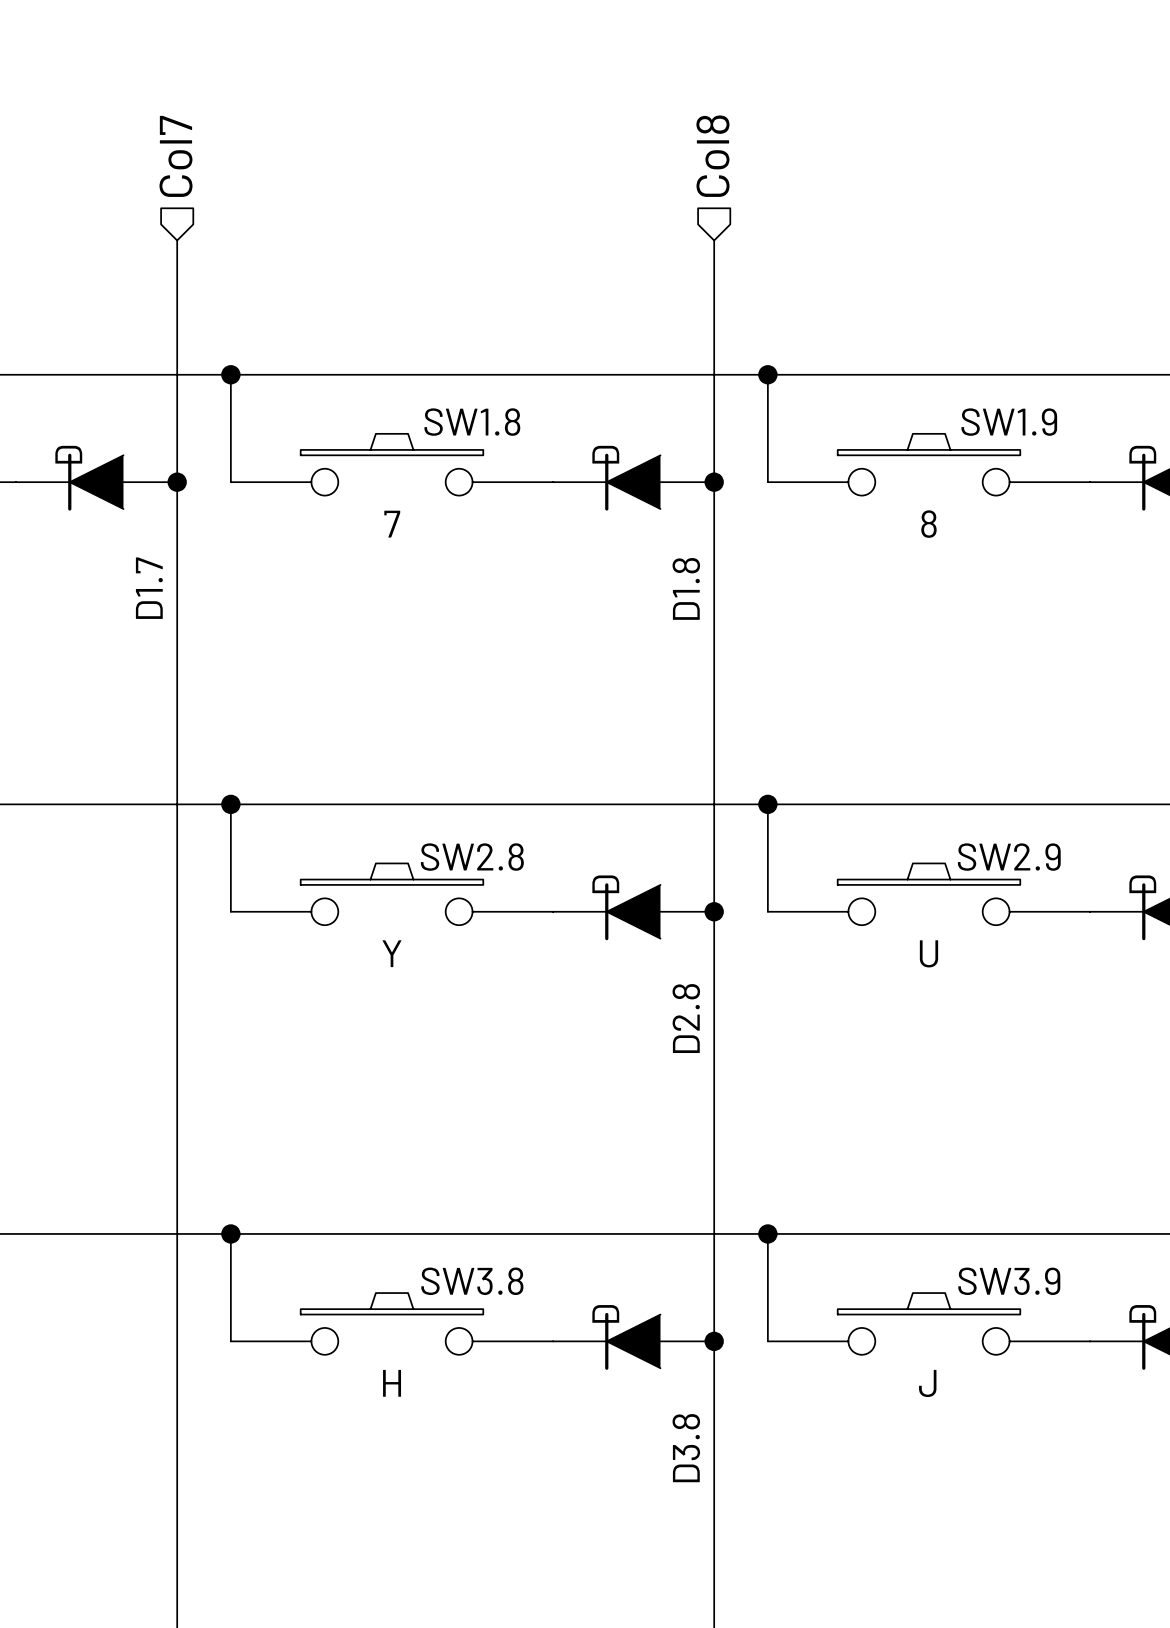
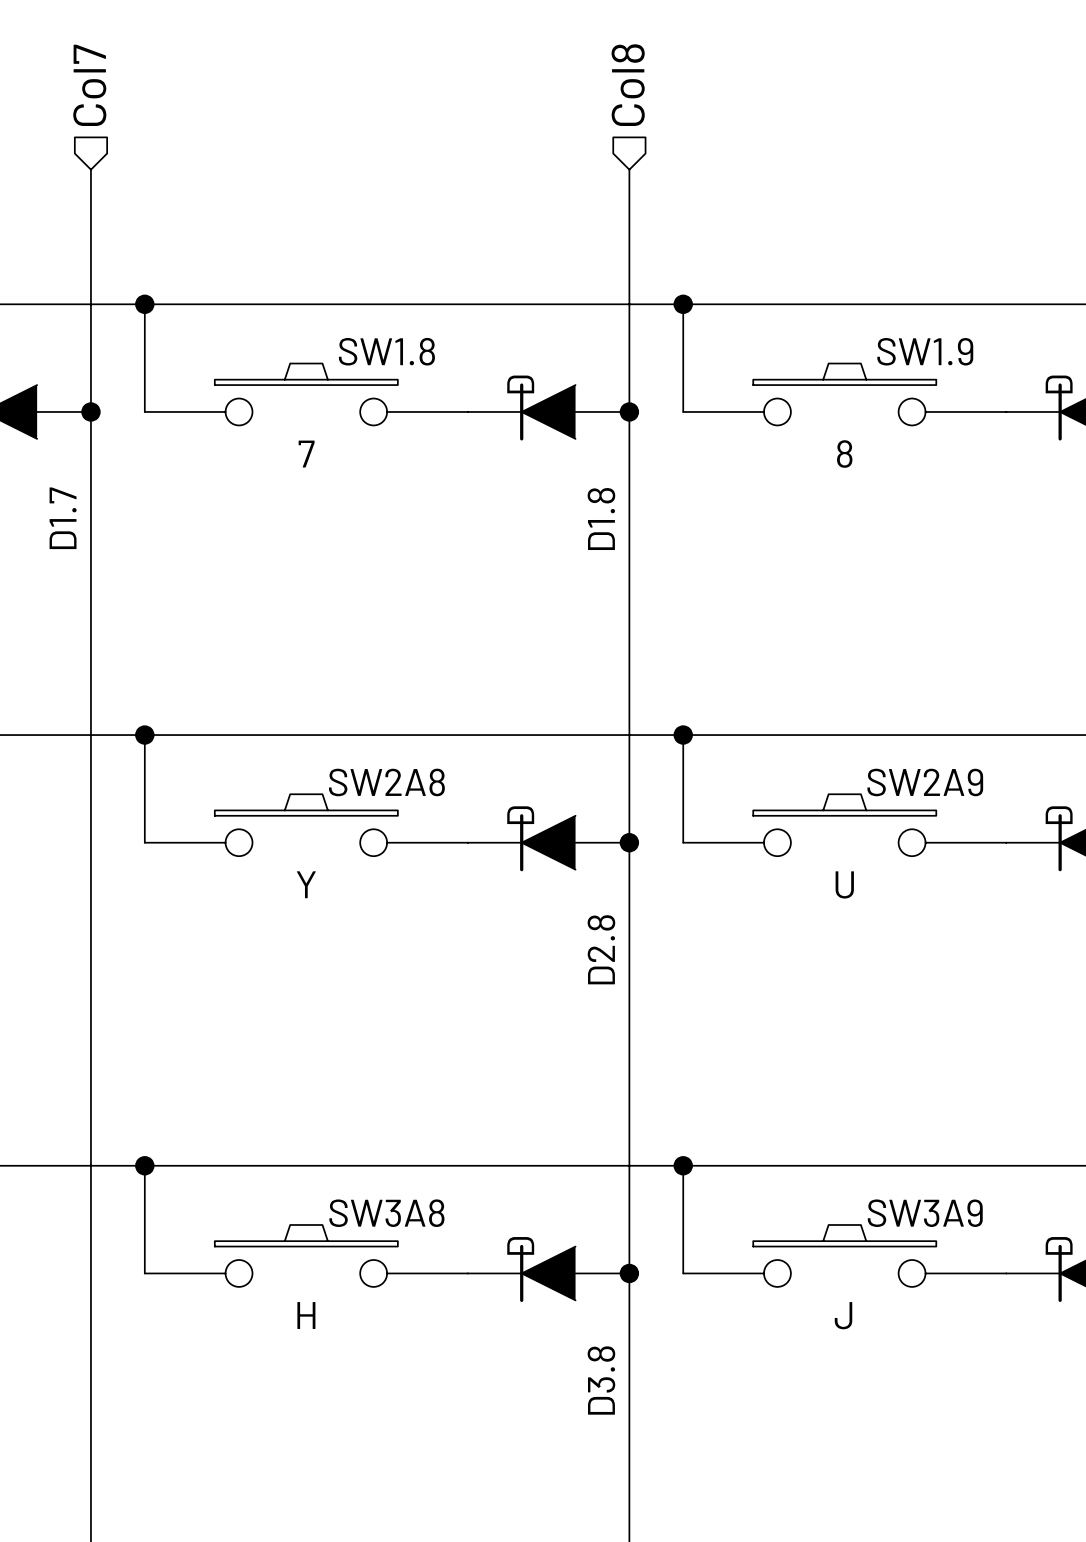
SW2.8 name: SW2.8 (472, 857) -> SW2A8 (386, 782)
SW2.9 name: SW2.9 (1009, 857) -> SW2A9 (925, 782)
SW3.8 name: SW3.8 (472, 1281) -> SW3A8 (386, 1213)
SW3.9 name: SW3.9 (1009, 1281) -> SW3A9 (925, 1213)

